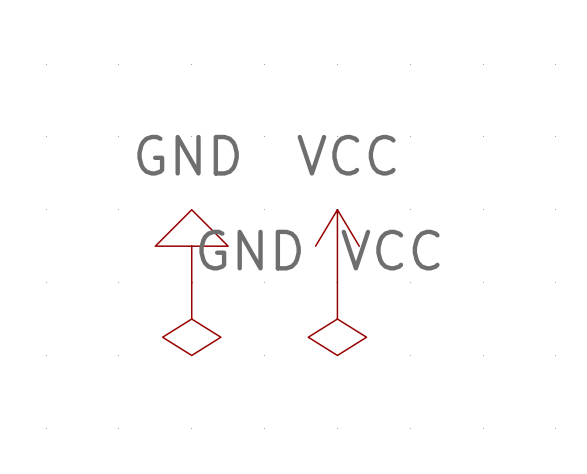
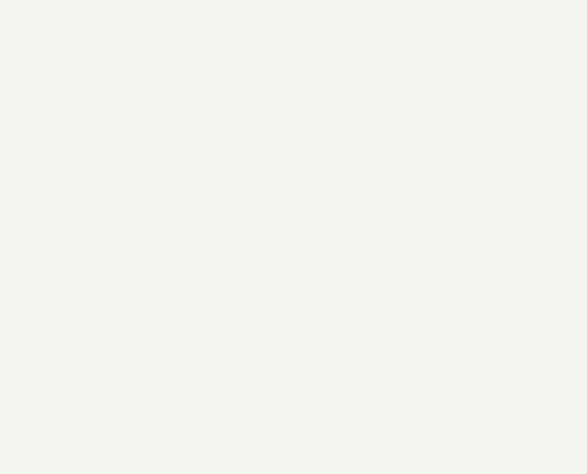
power symbol: GND (191, 246) -> none
power symbol: VCC (337, 246) -> none
label: GND (250, 250) -> none
label: VCC (390, 250) -> none
power symbol: (191, 319) -> none
power symbol: (337, 319) -> none

